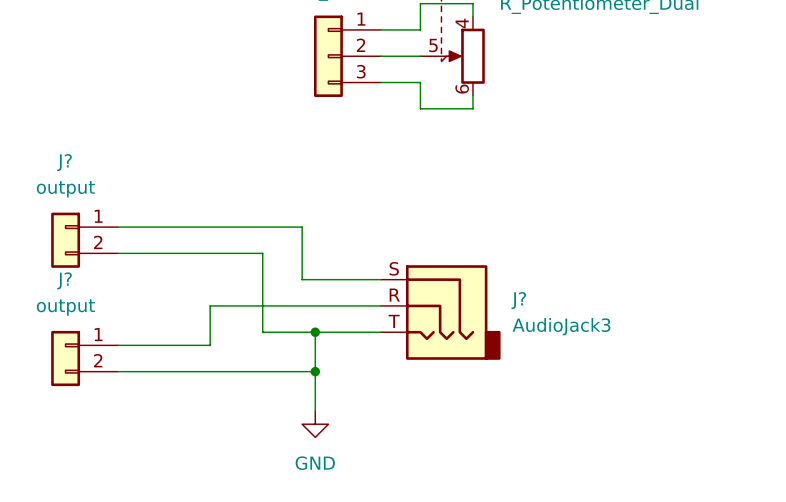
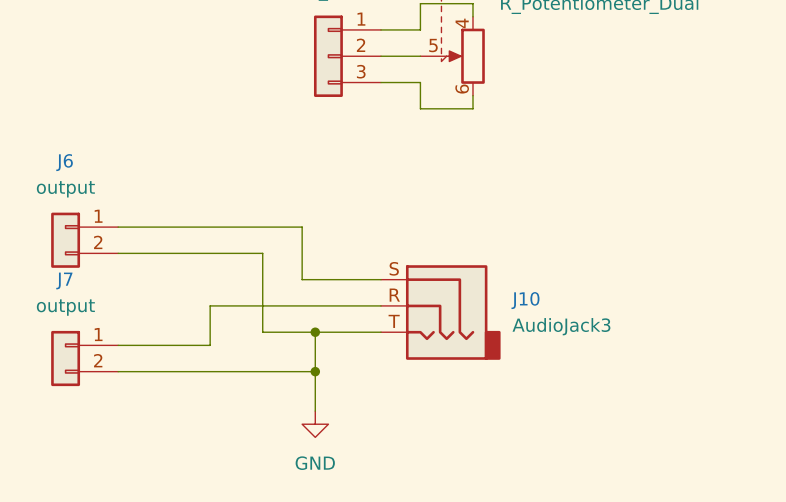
J? name: J? (64, 162) -> J6 (64, 162)
J? name: J? (64, 280) -> J7 (64, 280)
J? name: J? (518, 300) -> J10 (525, 300)

